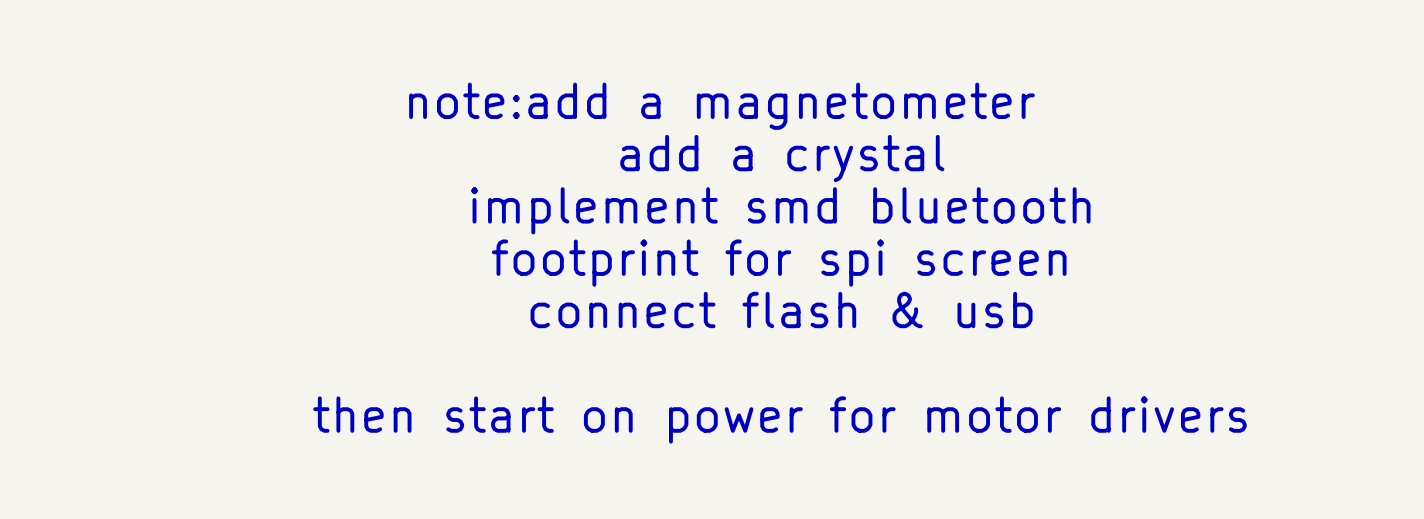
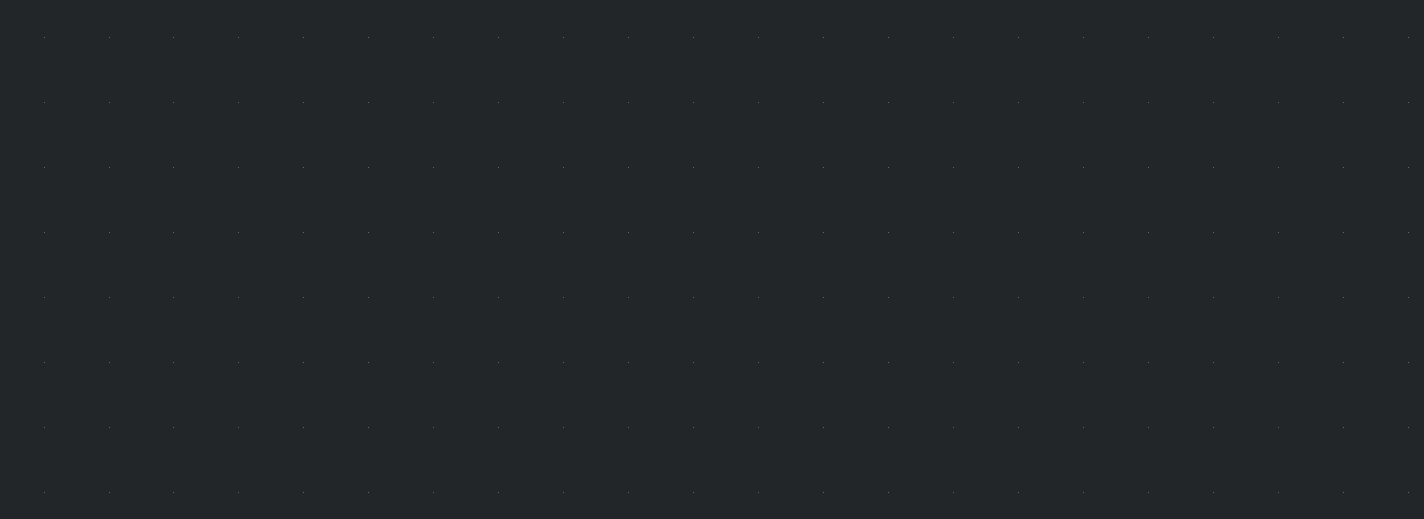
text: note:add a magnetometer (721, 106) -> none
text: add a crystal (782, 158) -> none
text: implement smd bluetooth (780, 210) -> none
text: footprint for spi screen (779, 263) -> none
text: connect flash & usb (781, 309) -> none
text: then start on power for motor drivers (779, 419) -> none

